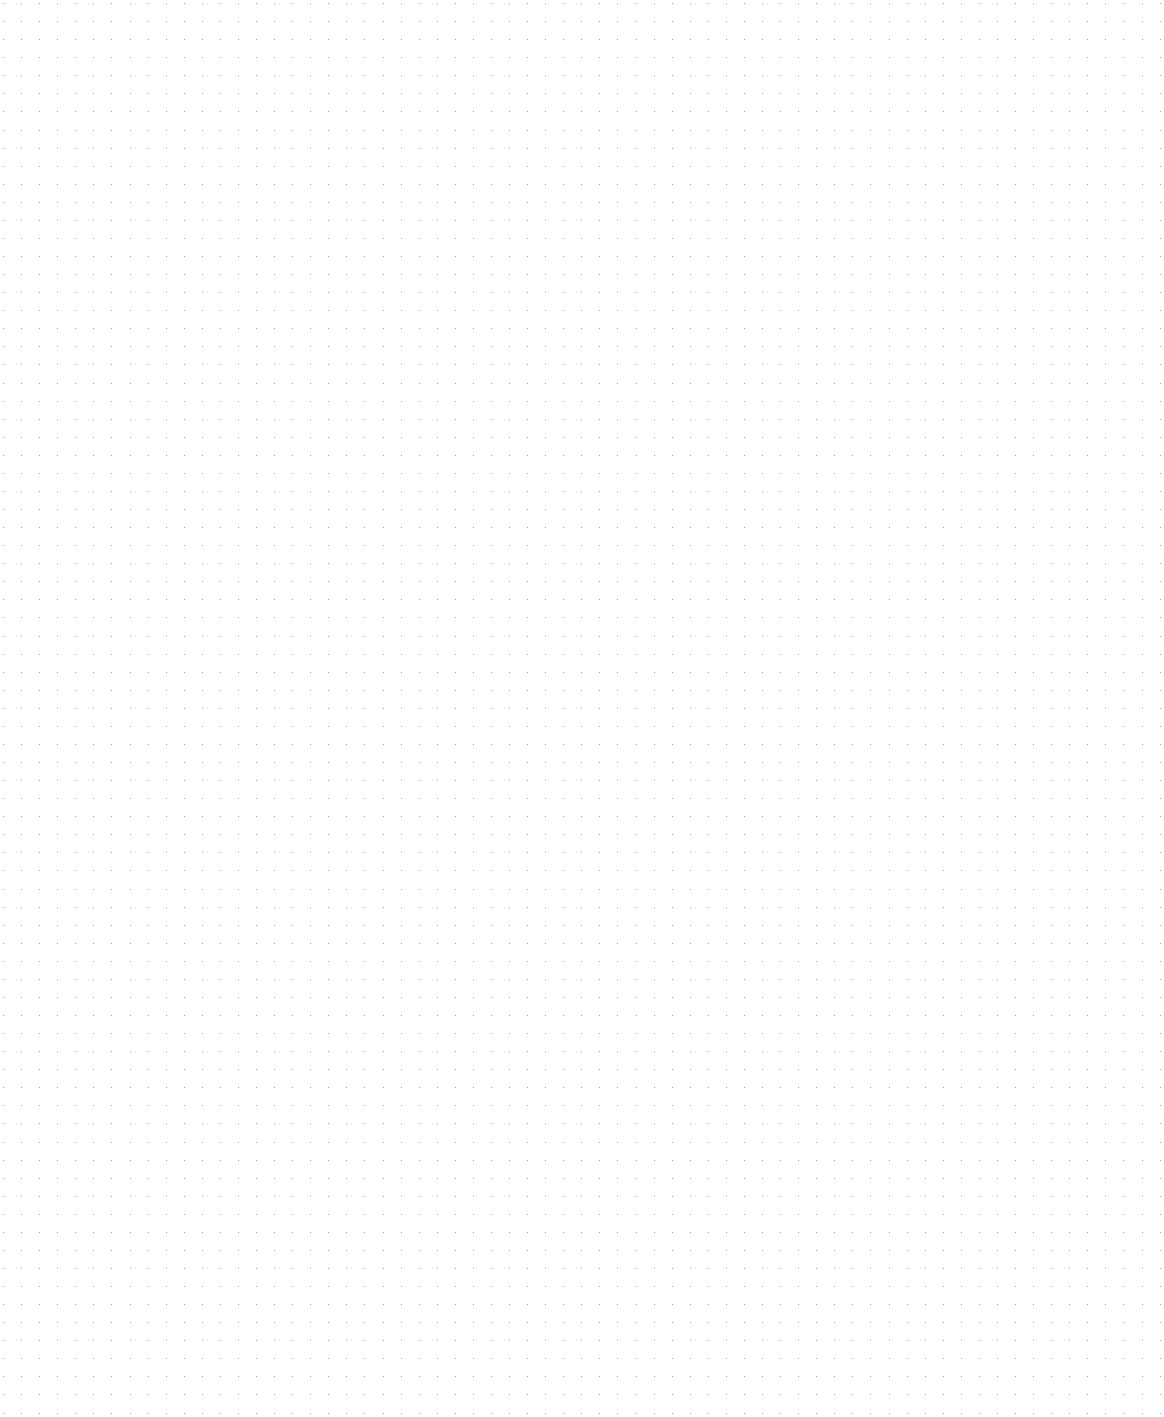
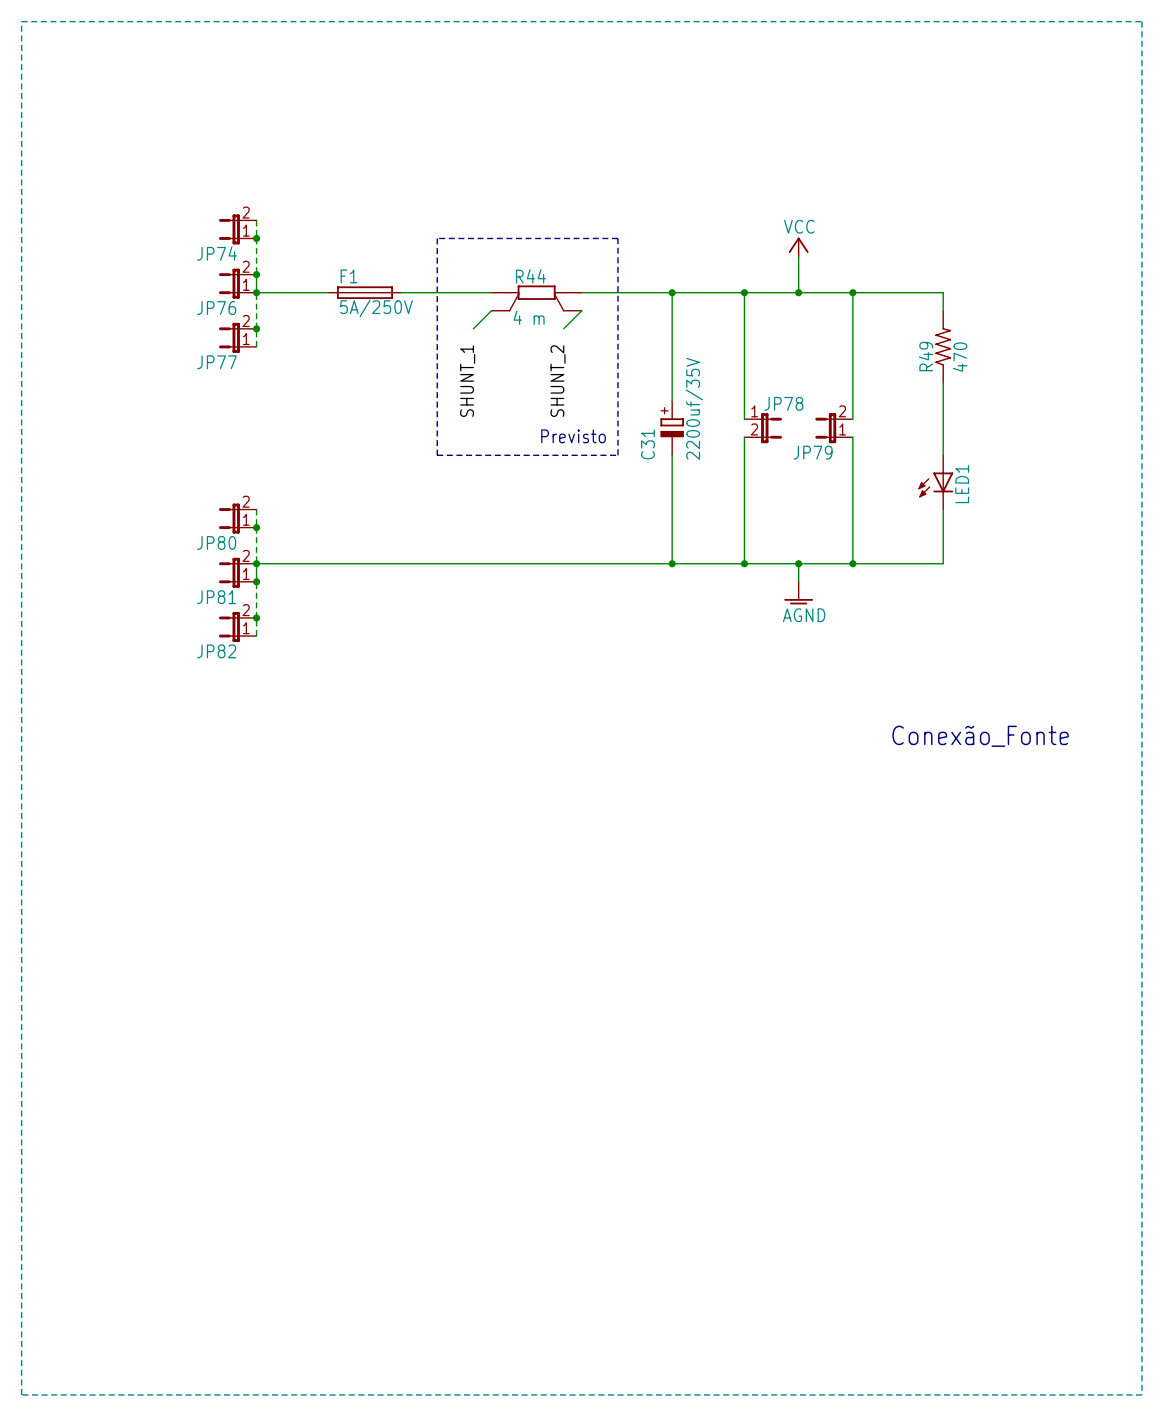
line: none -> (21, 21) (21, 1394) (1142, 1394) (1142, 21) (21, 21)
wire: none -> (256, 220) (256, 292)
JP74: none -> (237, 229)
junction: none -> (256, 238)
line: none -> (437, 238) (437, 455) (617, 455) (617, 238) (437, 238)
power symbol: none -> VCC (798, 247)
wire: none -> (798, 256) (798, 292)
junction: none -> (256, 274)
JP76: none -> (237, 283)
wire: none -> (256, 292) (256, 346)
wire: none -> (256, 292) (328, 292)
junction: none -> (256, 292)
F1: none -> 5A/250V (364, 292)
wire: none -> (401, 292) (491, 292)
wire: none -> (581, 292) (943, 292) (943, 310)
wire: none -> (672, 292) (672, 401)
junction: none -> (672, 292)
wire: none -> (744, 292) (744, 419)
junction: none -> (744, 292)
junction: none -> (798, 292)
wire: none -> (852, 292) (852, 419)
junction: none -> (852, 292)
R44: none -> 4 m (536, 298)
wire: none -> (491, 310) (473, 328)
wire: none -> (581, 310) (563, 328)
junction: none -> (256, 328)
JP77: none -> (237, 337)
R49: none -> 470 (943, 346)
label: none -> SHUNT_1 (467, 381)
label: none -> SHUNT_2 (558, 381)
wire: none -> (943, 383) (943, 455)
C31: none -> 2200uf/35V (672, 428)
JP78: none -> (763, 428)
JP79: none -> (834, 428)
text: none -> Previsto (573, 436)
wire: none -> (744, 437) (744, 563)
wire: none -> (852, 437) (852, 563)
wire: none -> (672, 455) (672, 563)
LED1: none -> (935, 482)
wire: none -> (256, 509) (256, 563)
wire: none -> (943, 509) (943, 563) (256, 563)
JP80: none -> (237, 518)
junction: none -> (256, 527)
wire: none -> (256, 563) (256, 636)
junction: none -> (256, 563)
junction: none -> (672, 563)
junction: none -> (744, 563)
wire: none -> (798, 563) (798, 581)
junction: none -> (798, 563)
junction: none -> (852, 563)
JP81: none -> (237, 572)
junction: none -> (256, 581)
power symbol: none -> AGND (798, 593)
junction: none -> (256, 617)
JP82: none -> (237, 626)
text: none -> Conexão_Fonte (980, 736)

